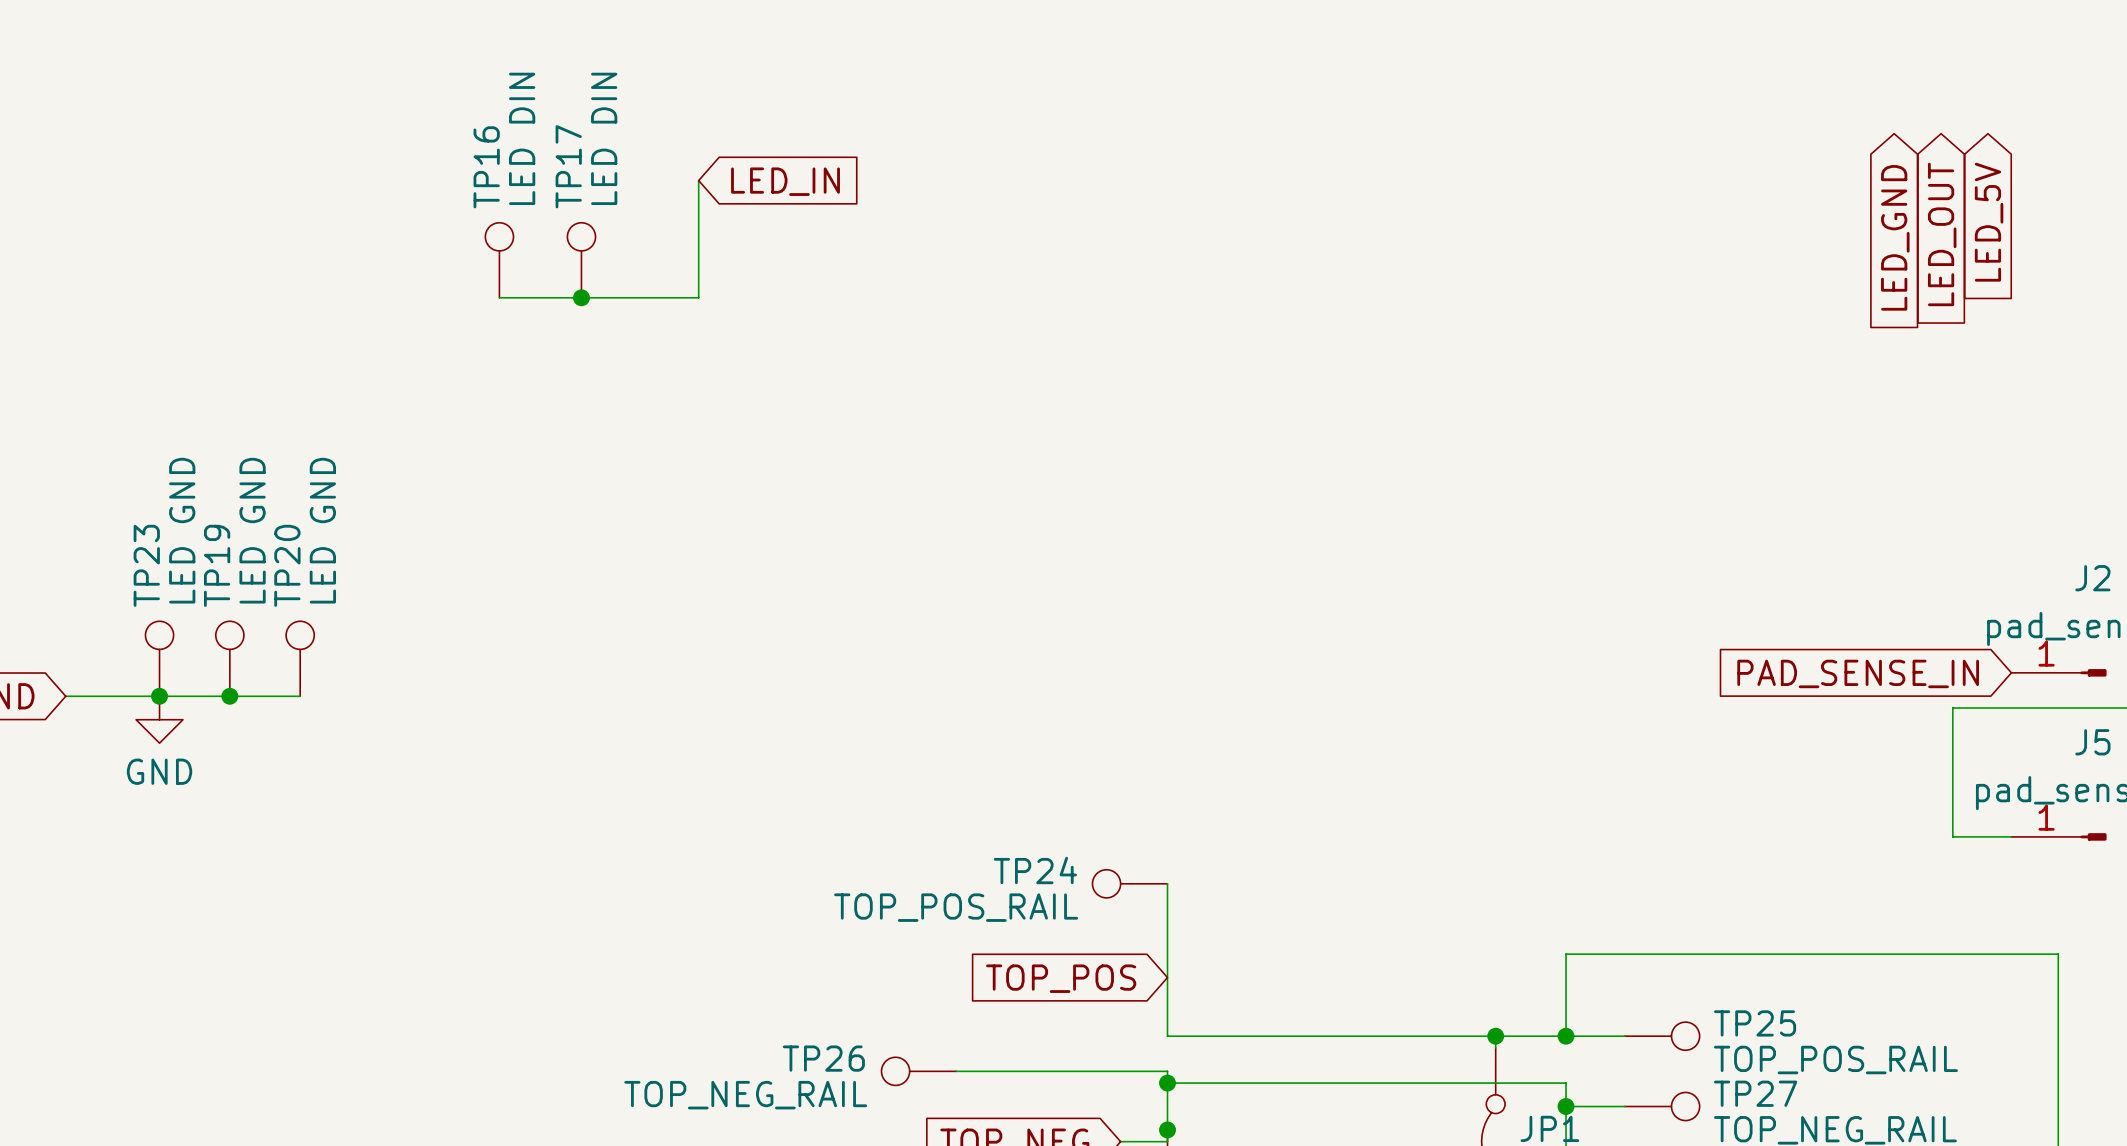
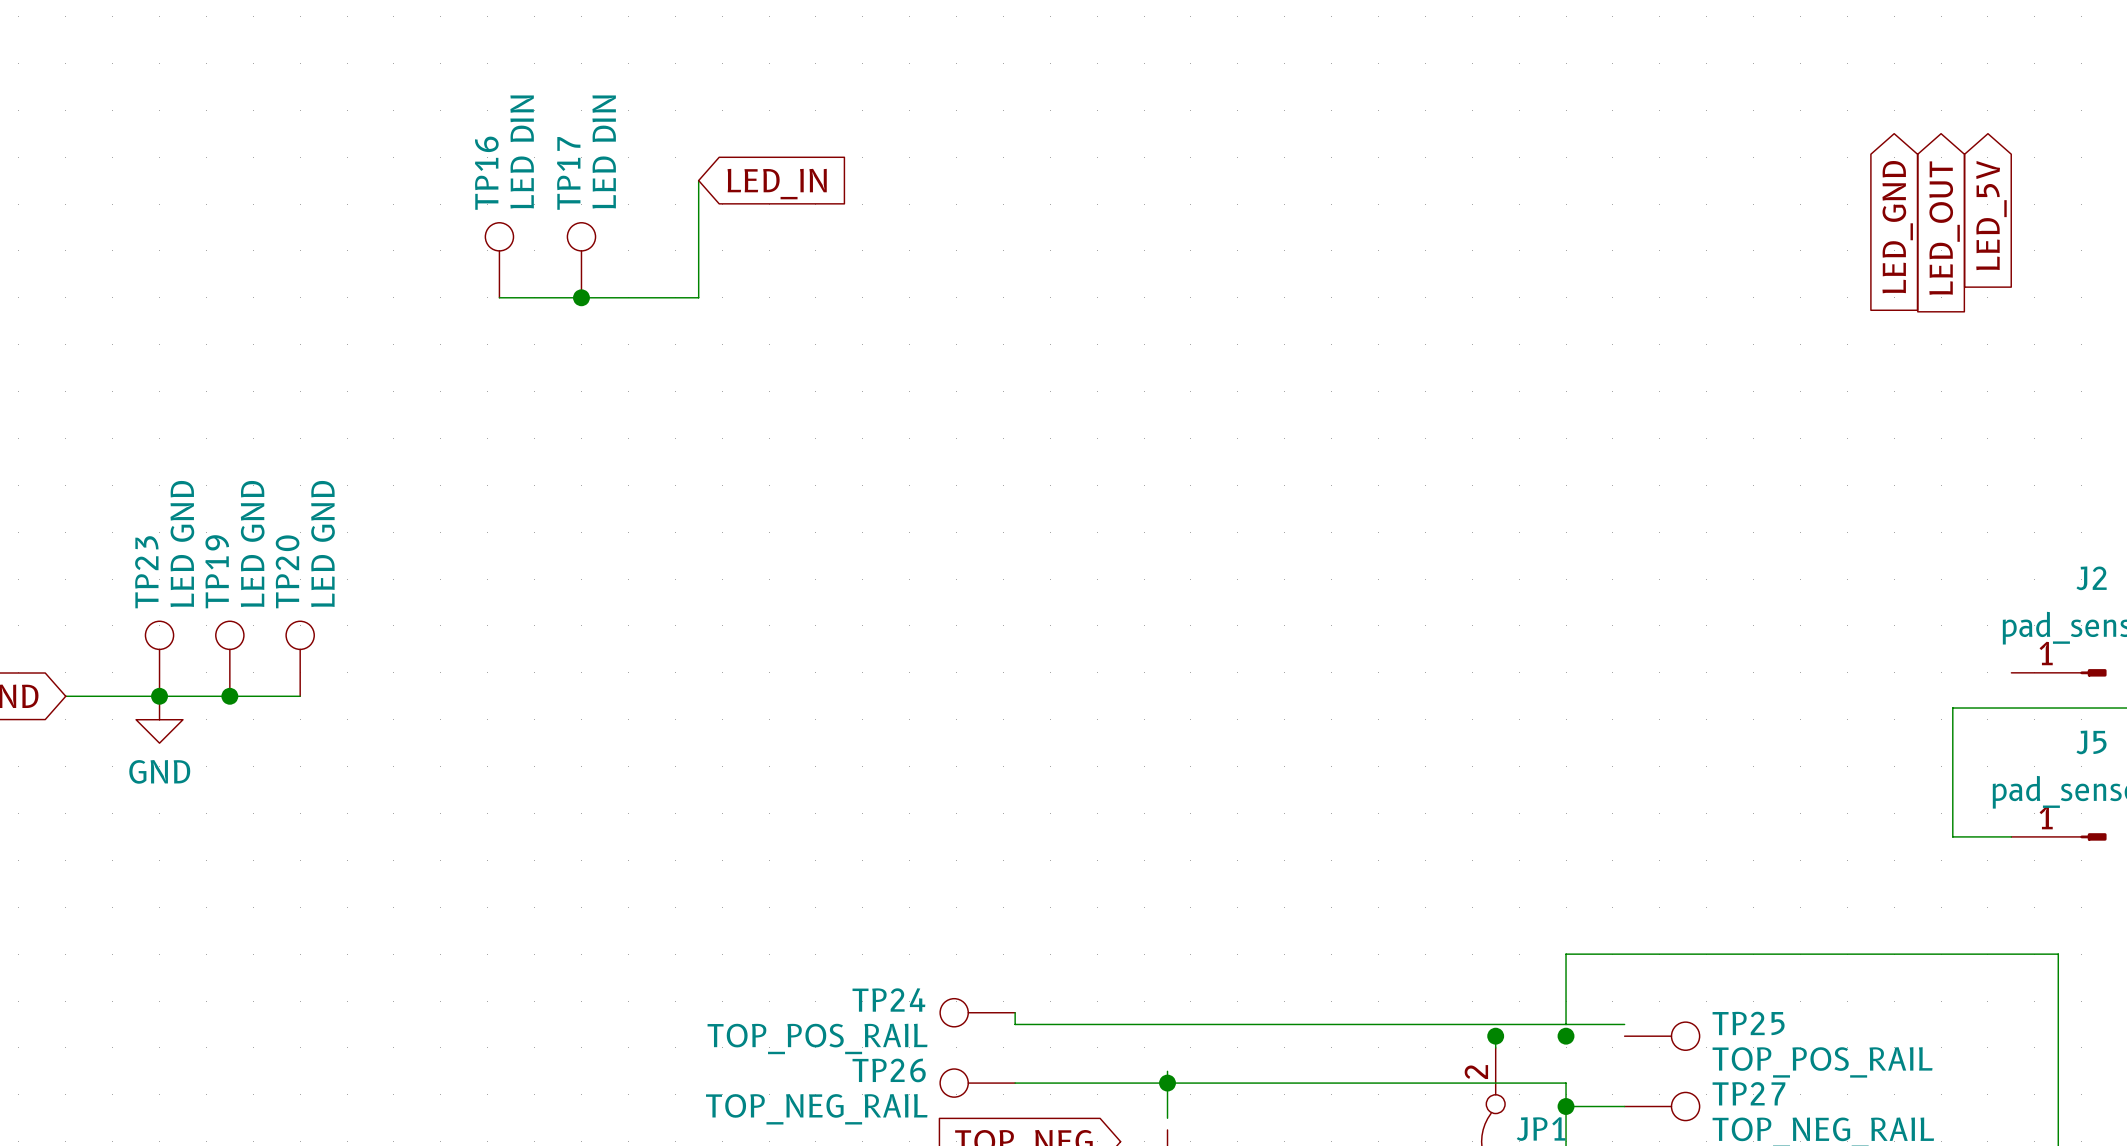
global label: PAD_SENSE_IN (1858, 673) -> none
TP24 position: (1130, 883) -> (977, 1012)
wire: (1167, 883) (1167, 1036) (1624, 1036) -> none
global label: TOP_POS (1061, 978) -> none
wire: none -> (1015, 1012) (1015, 1024) (1624, 1024)
TP26 position: (919, 1071) -> (977, 1083)
wire: (956, 1071) (1167, 1071) -> none
JP1 pin number: none -> 2 (1476, 1072)
wire: none -> (1015, 1083) (1167, 1083)
wire: (1167, 1118) (1167, 1141) (1120, 1141) -> none
junction: (1167, 1129) -> none

